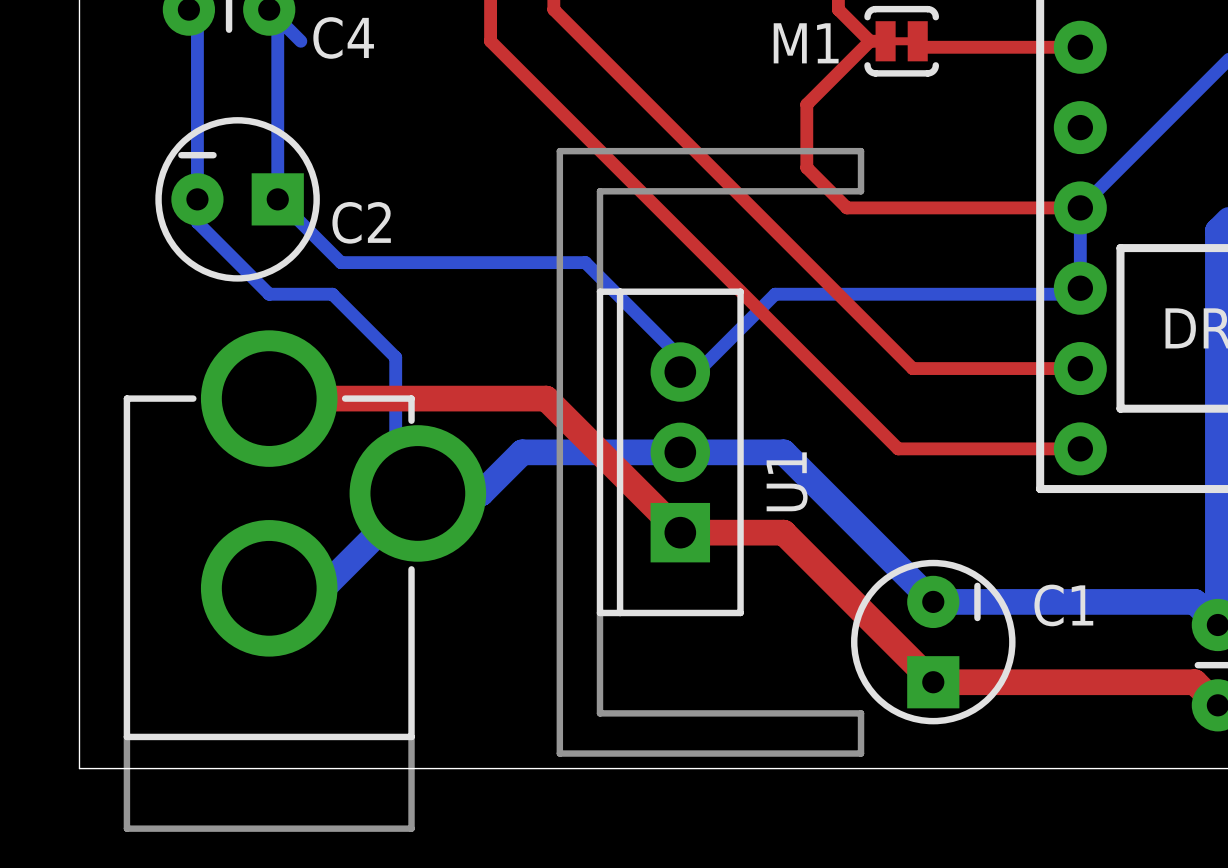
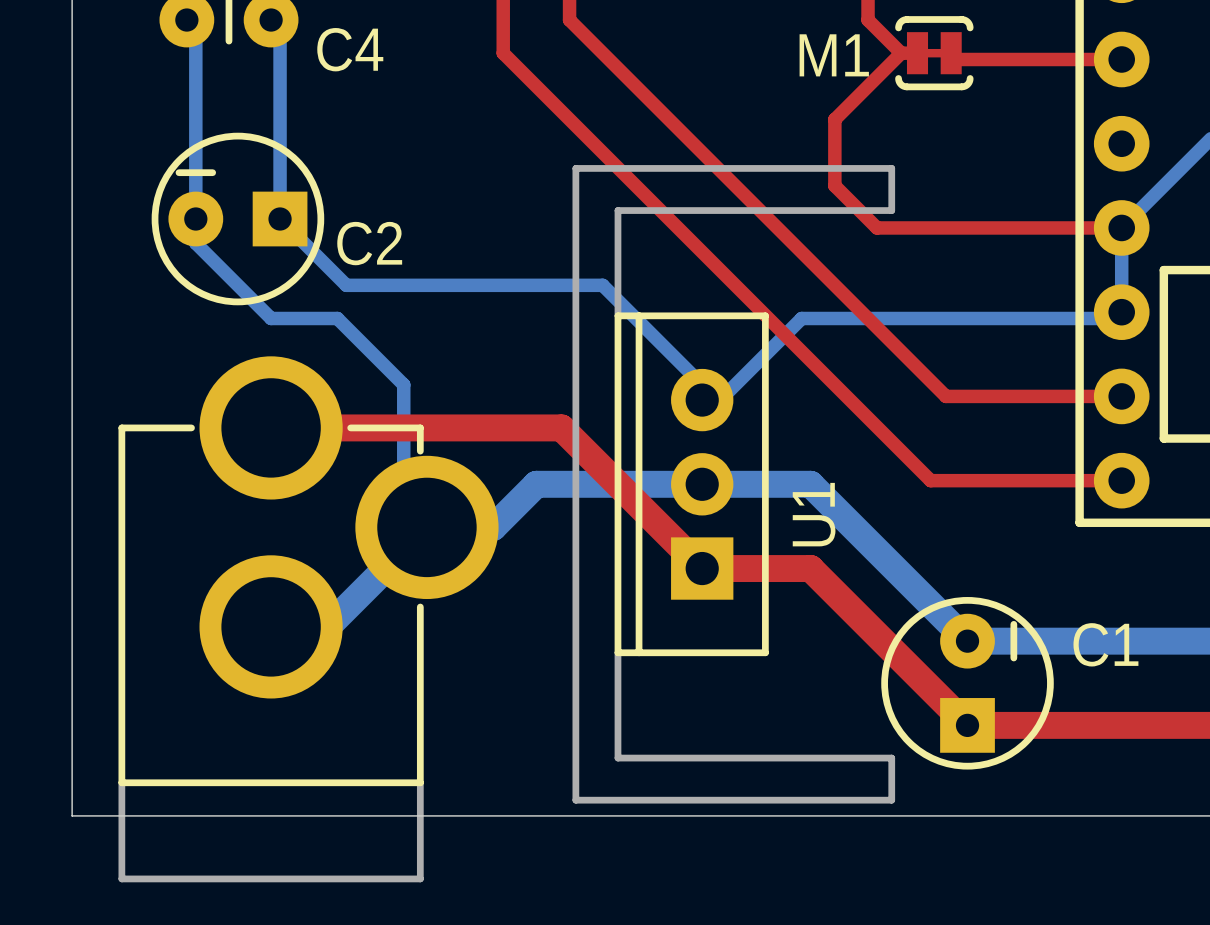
bottom track: (277, 18) (300, 41) -> none

